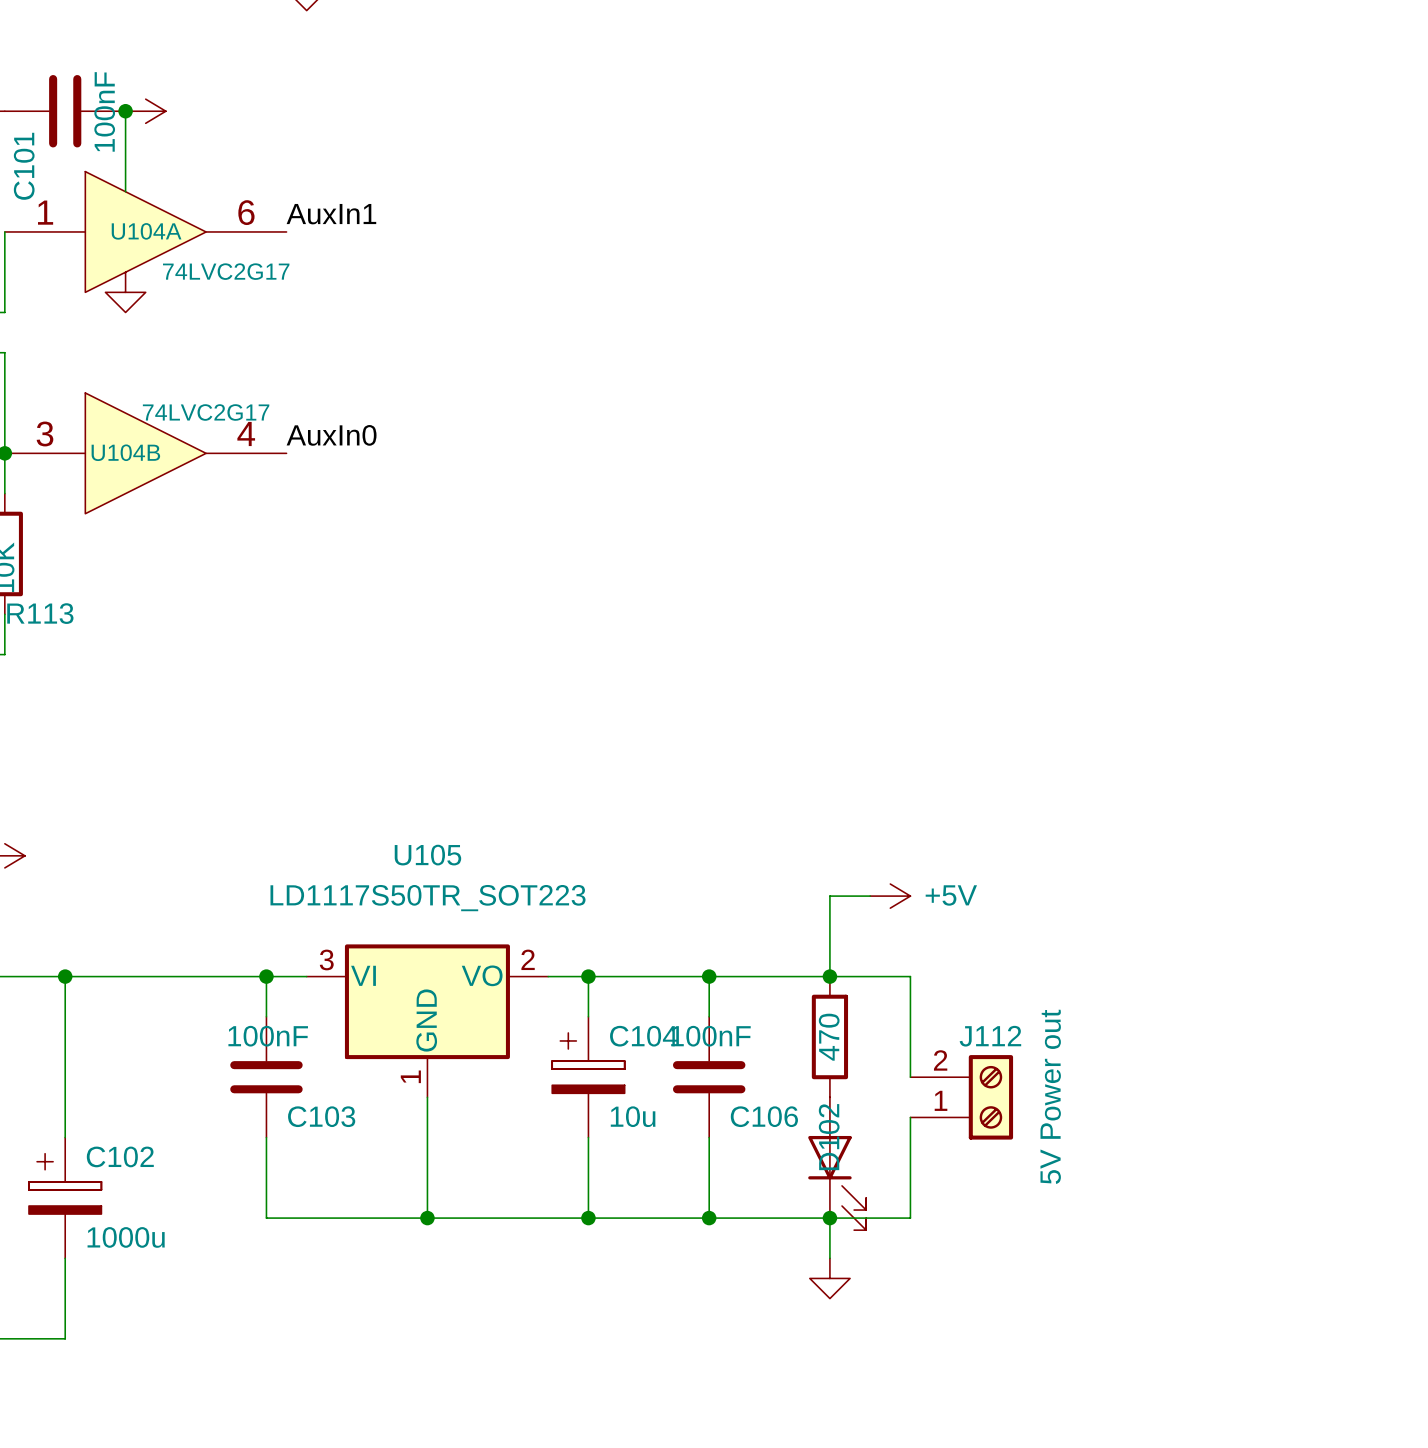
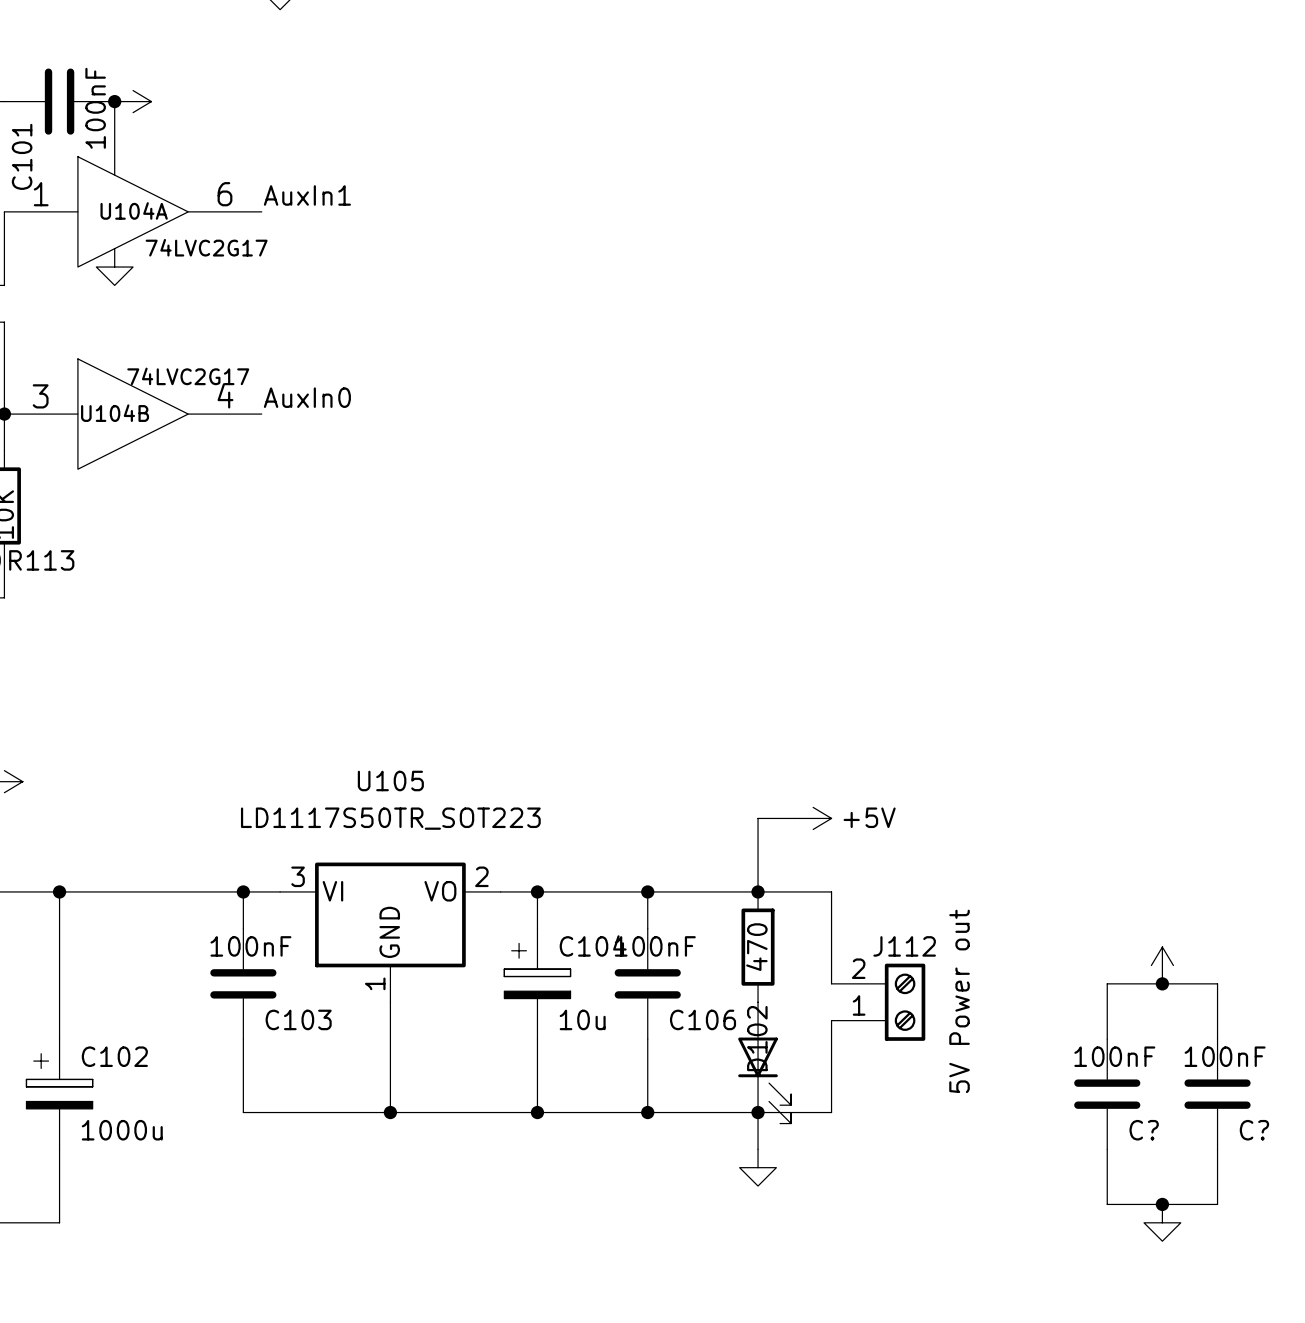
power symbol: none -> (1162, 965)
junction: none -> (1162, 983)
wire: none -> (1107, 1039) (1107, 983) (1217, 983) (1217, 1039)
C?: none -> 100nF (1107, 1094)
C?: none -> 100nF (1217, 1094)
wire: none -> (1107, 1149) (1107, 1204) (1217, 1204) (1217, 1149)
junction: none -> (1162, 1204)
power symbol: none -> (1162, 1222)

